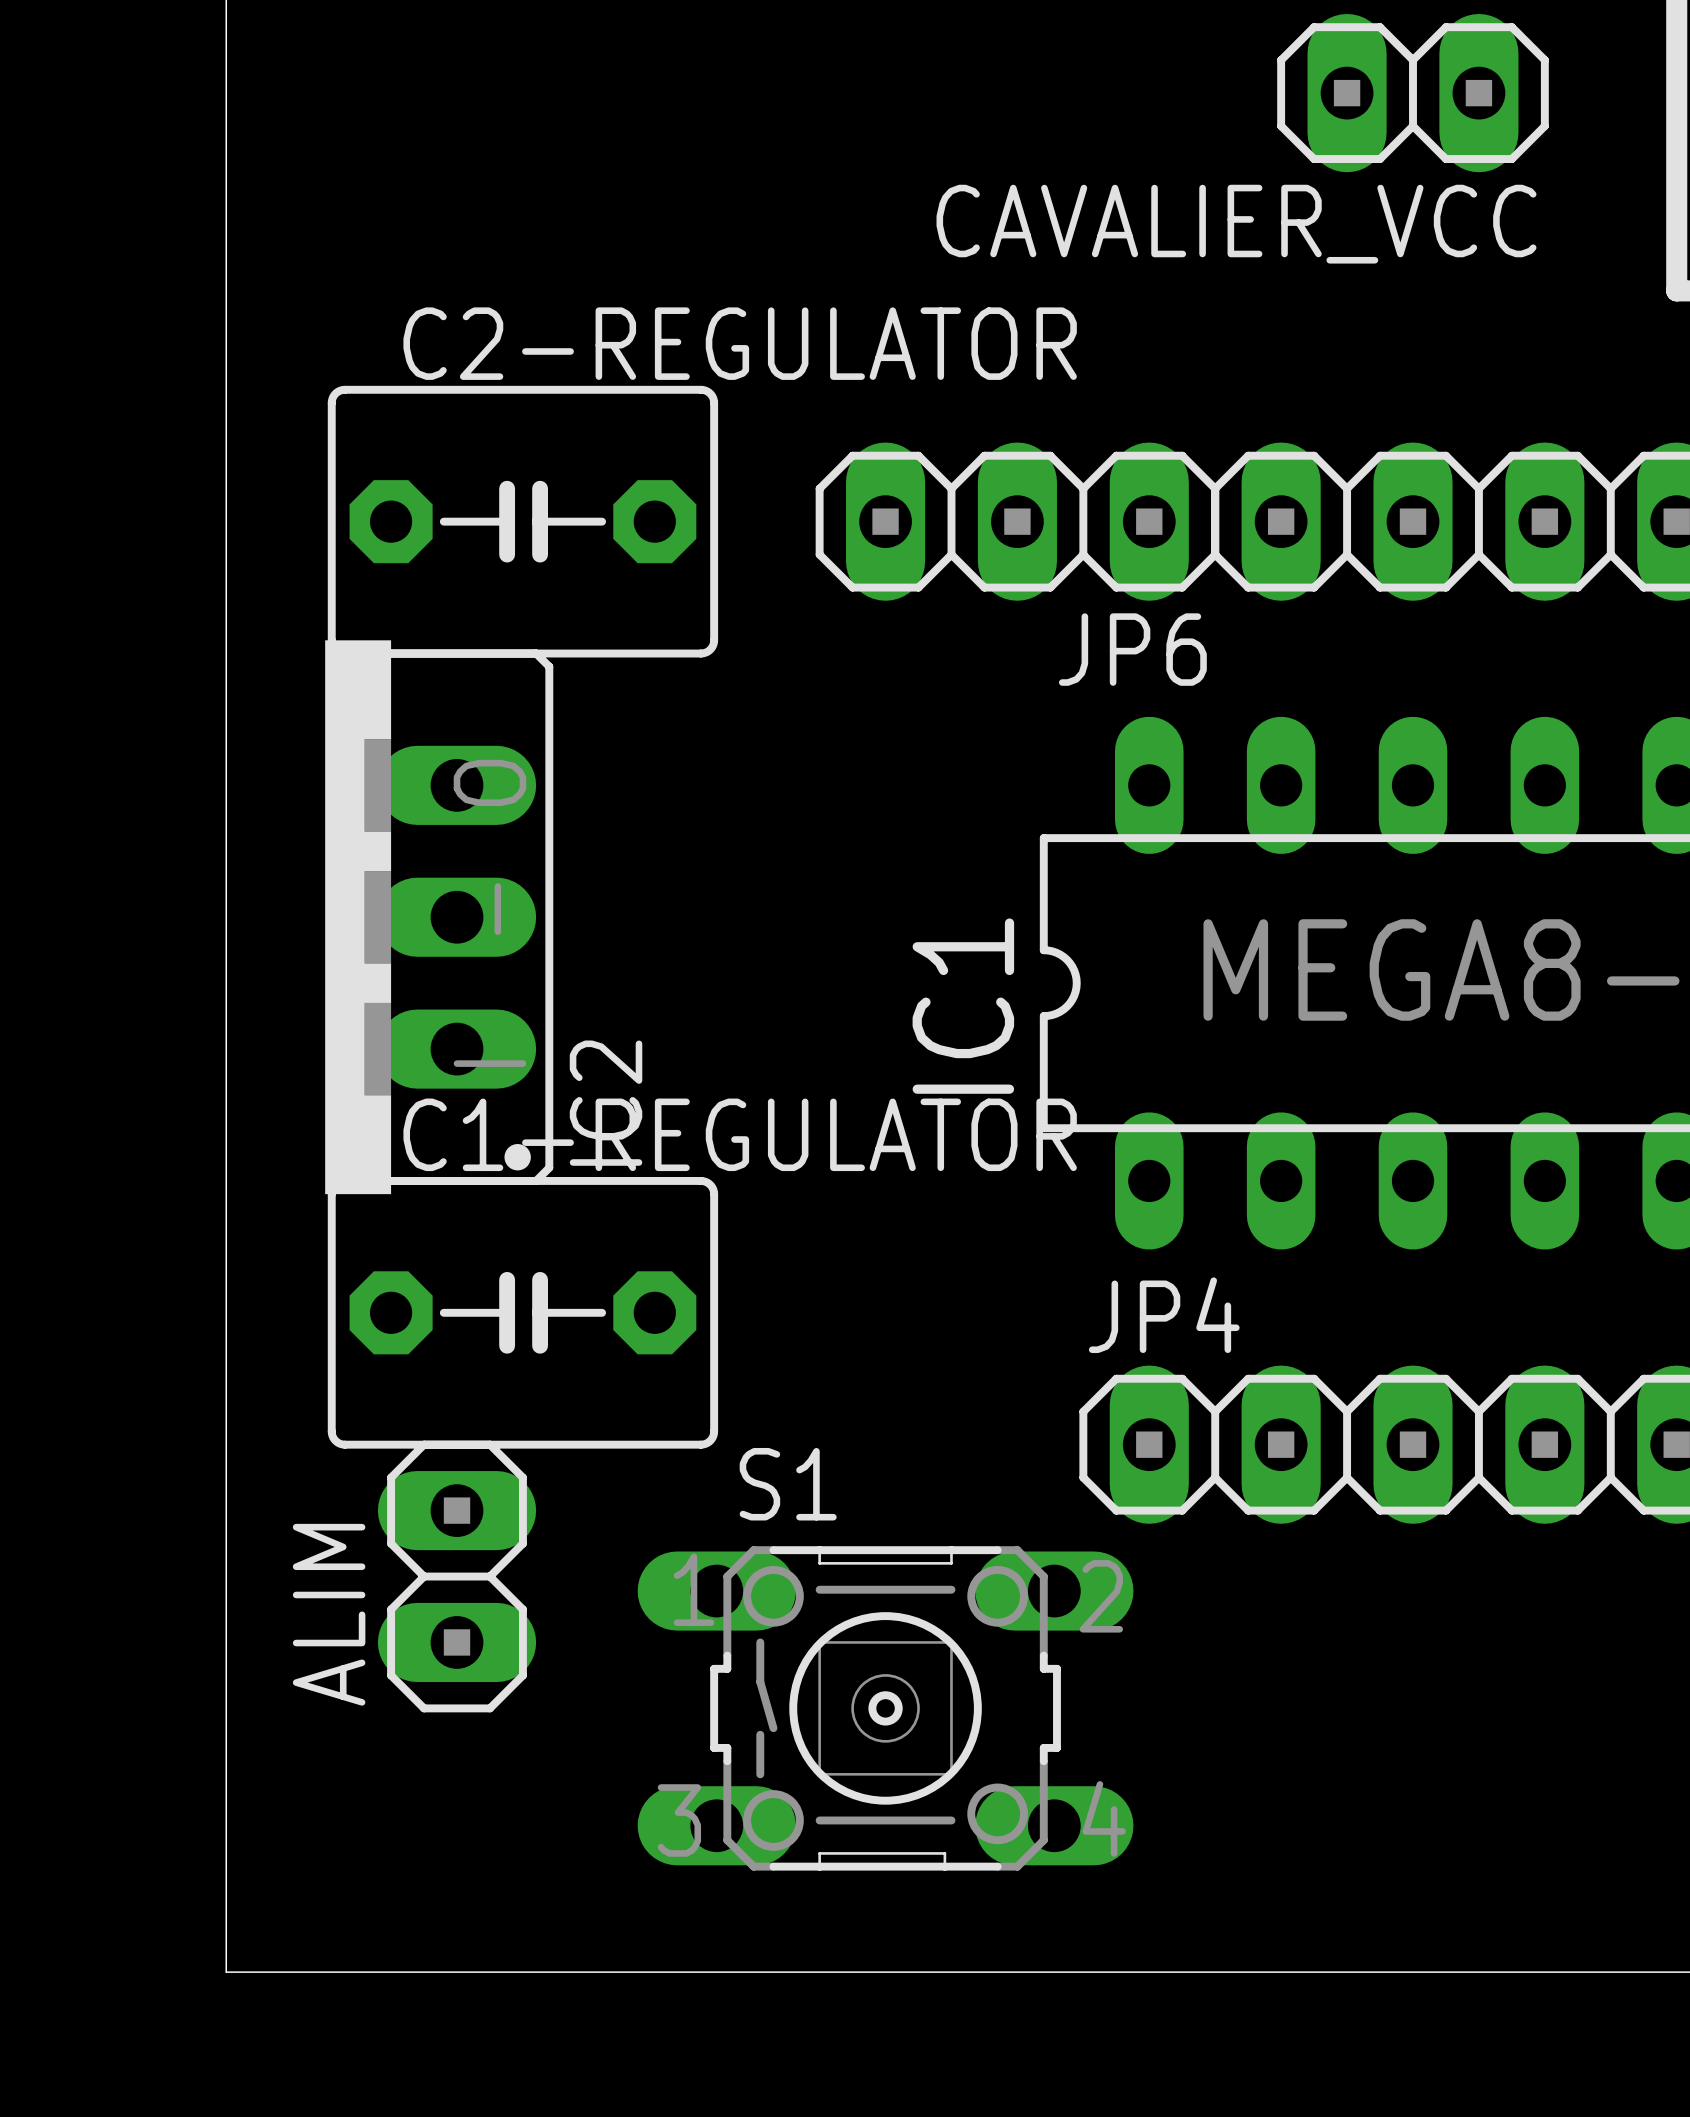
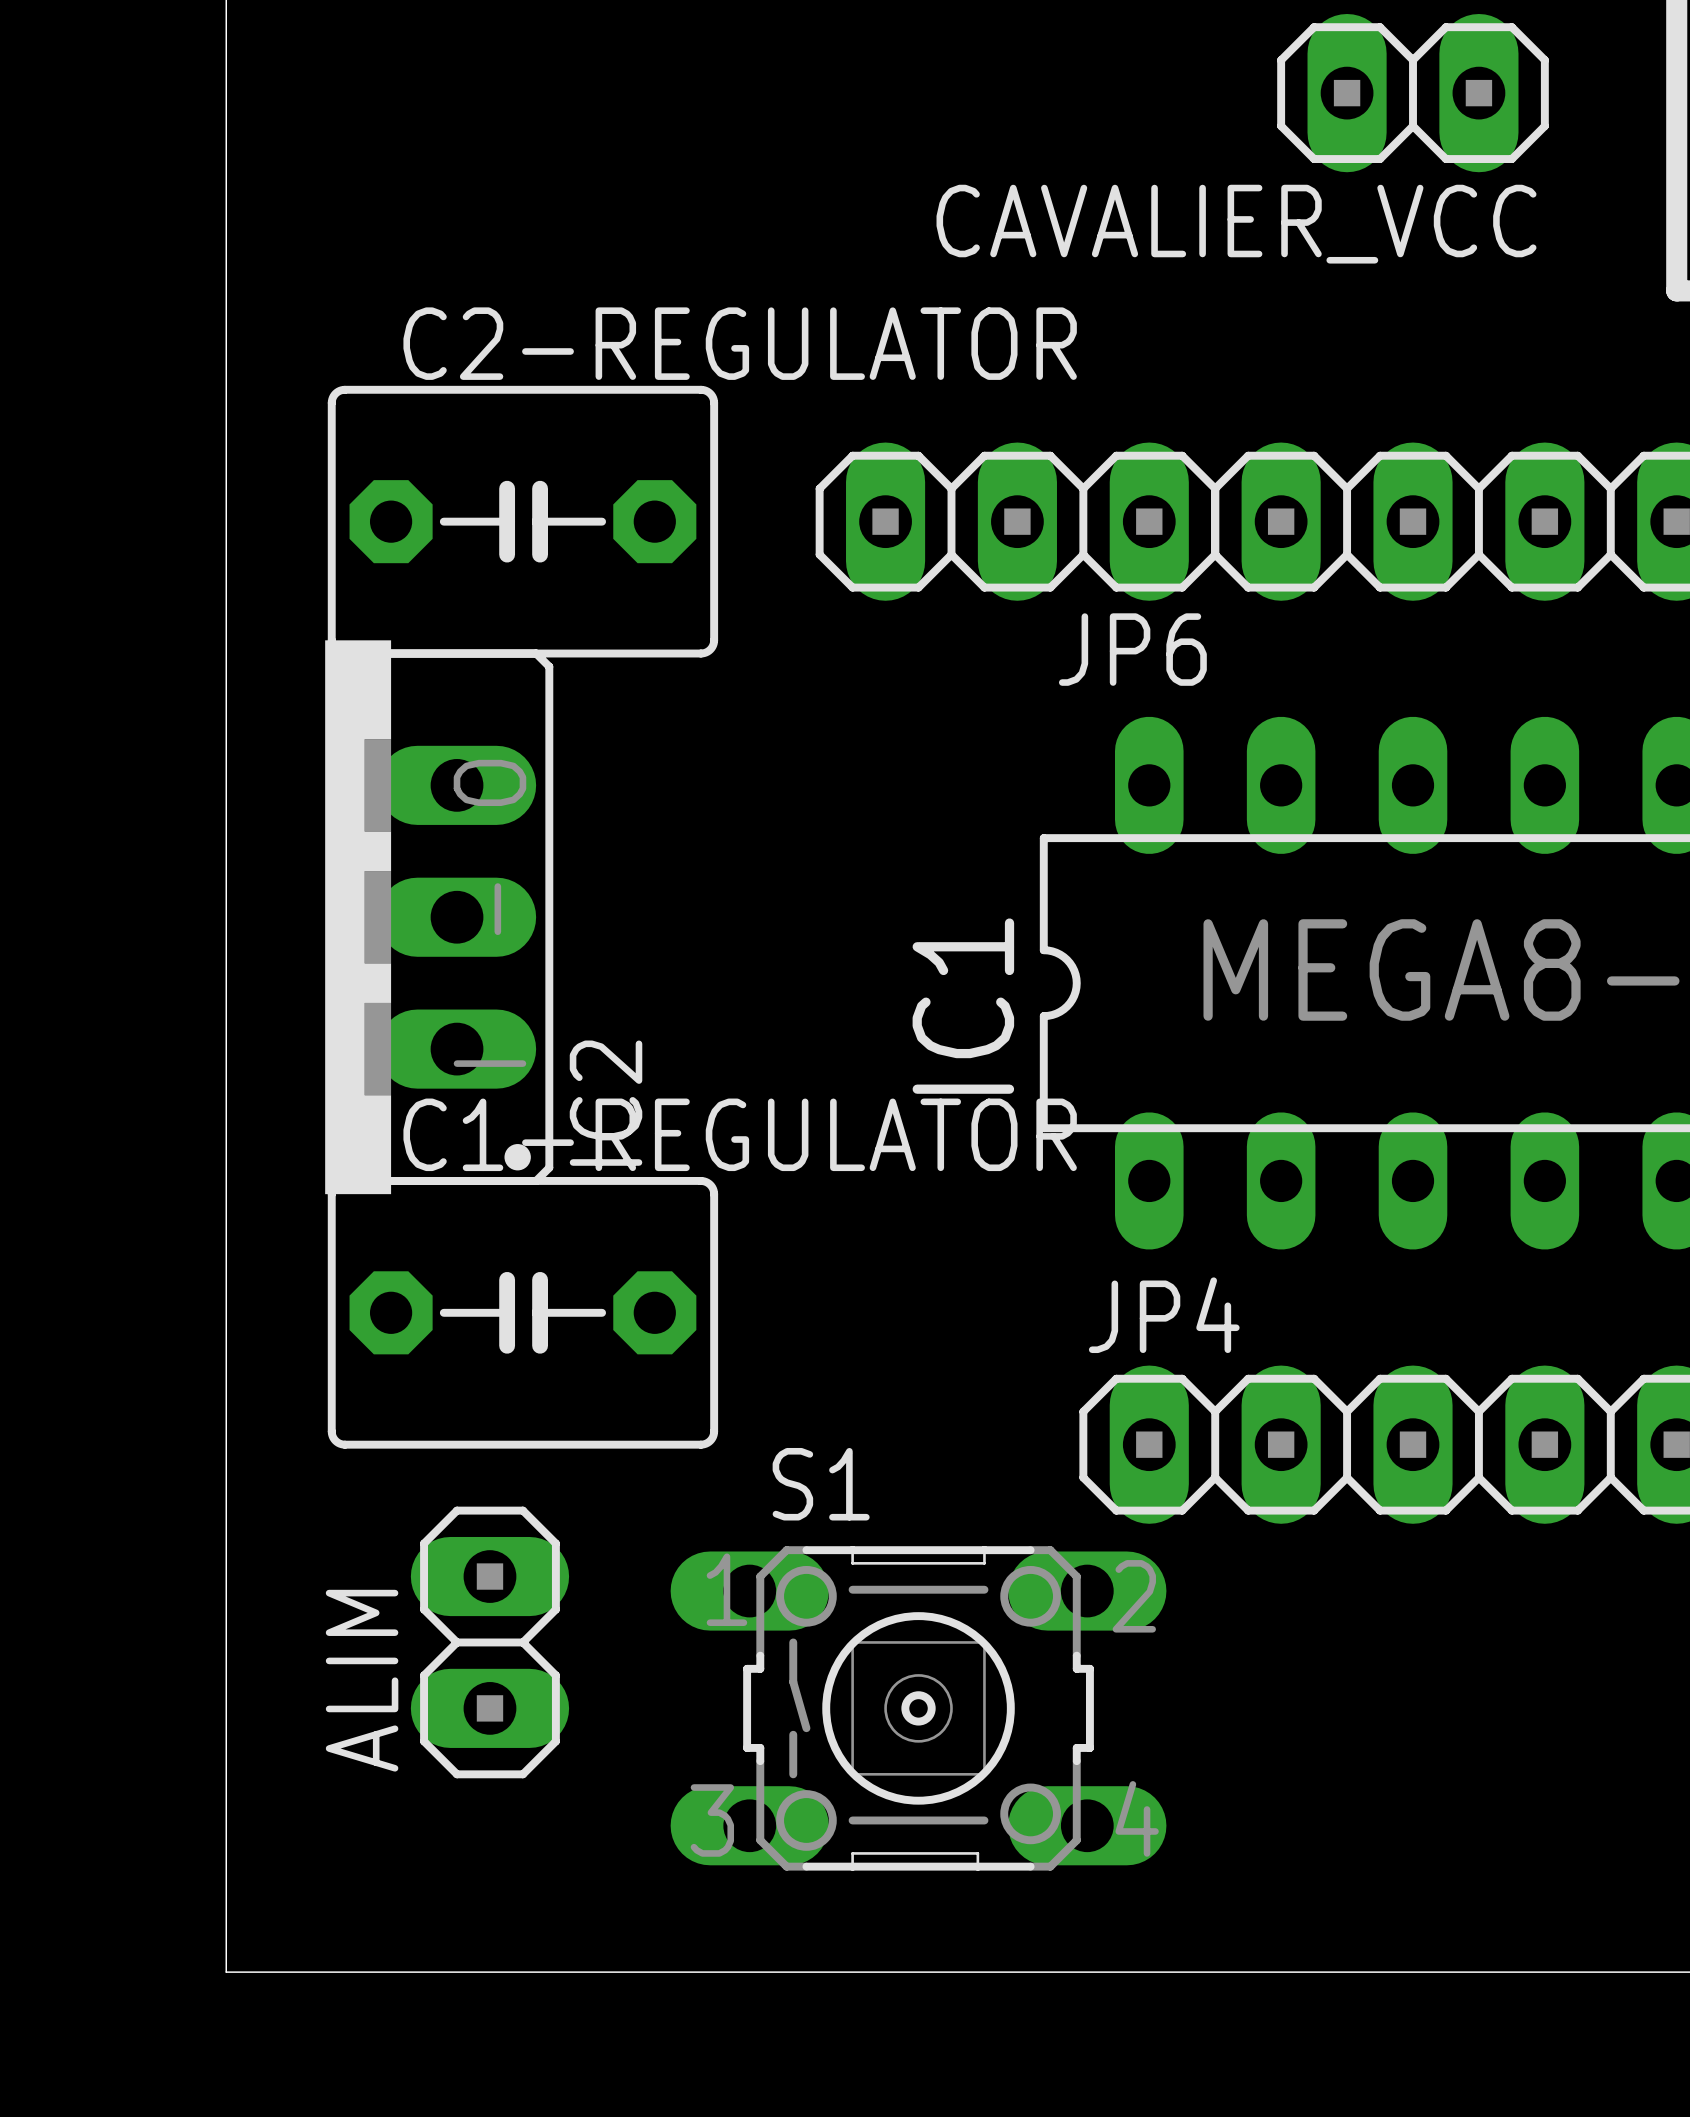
ALIM position: (457, 1576) -> (489, 1642)
S1 position: (885, 1708) -> (918, 1708)

